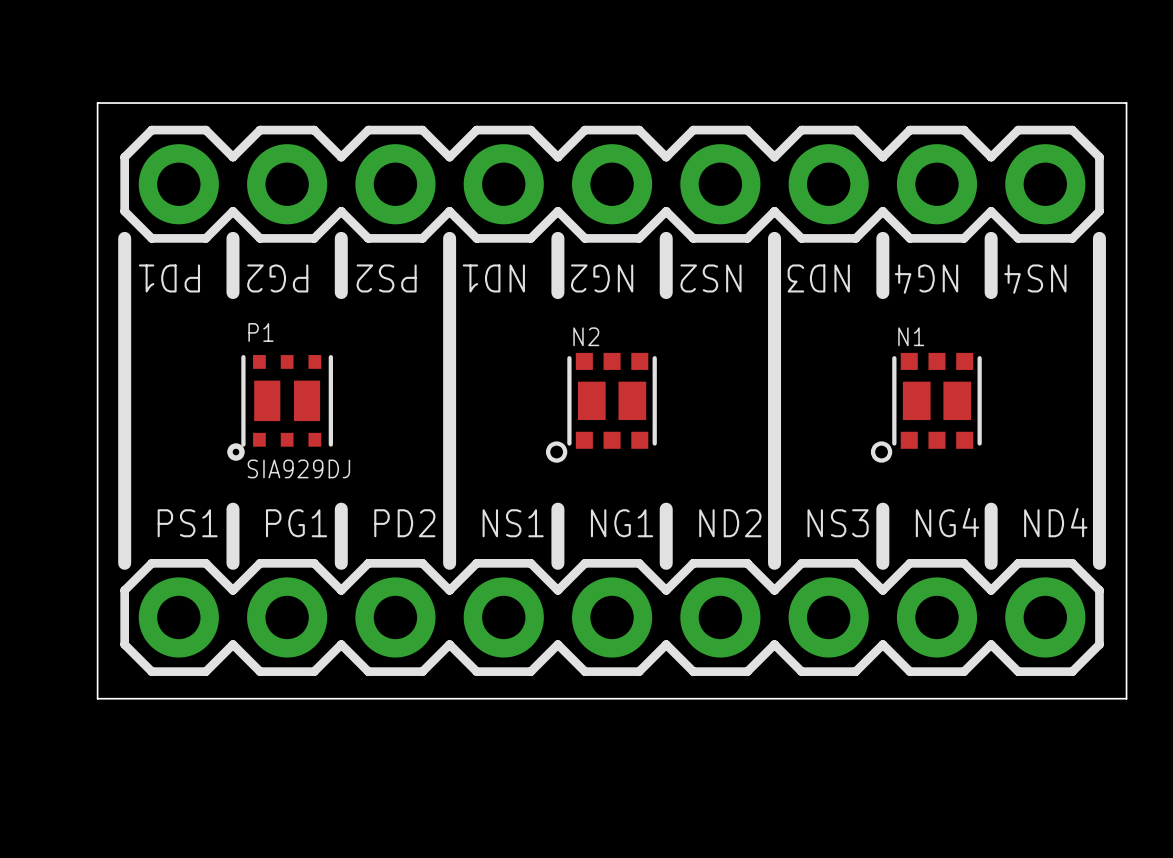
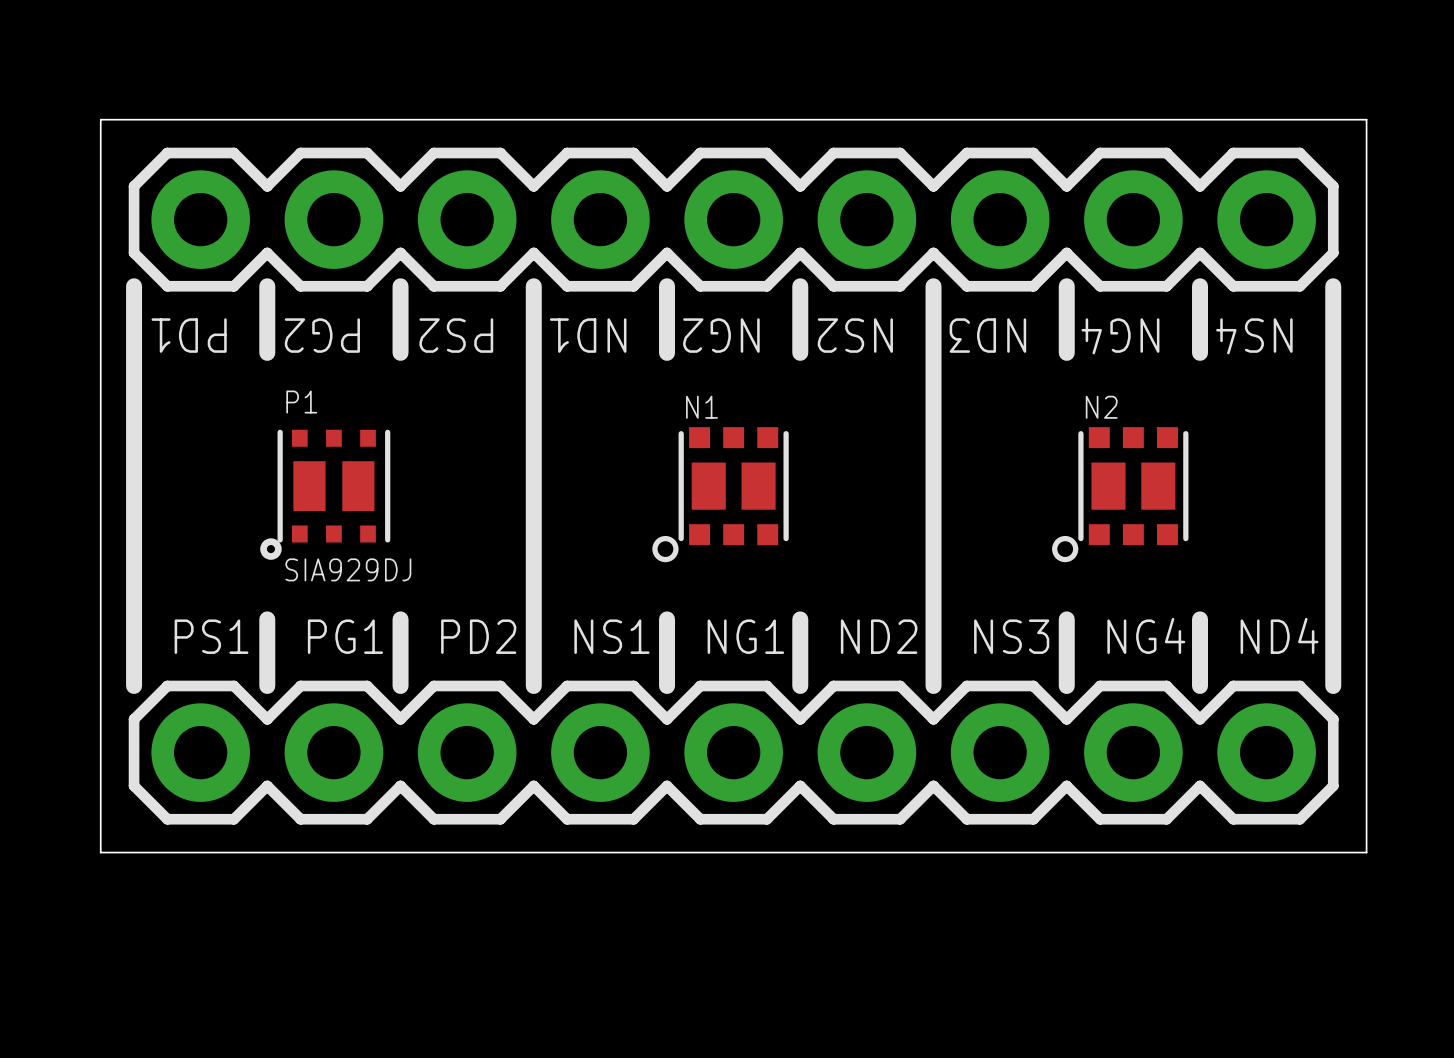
N2 name: N2 (586, 336) -> N1 (701, 407)
N1 name: N1 (911, 336) -> N2 (1101, 407)

